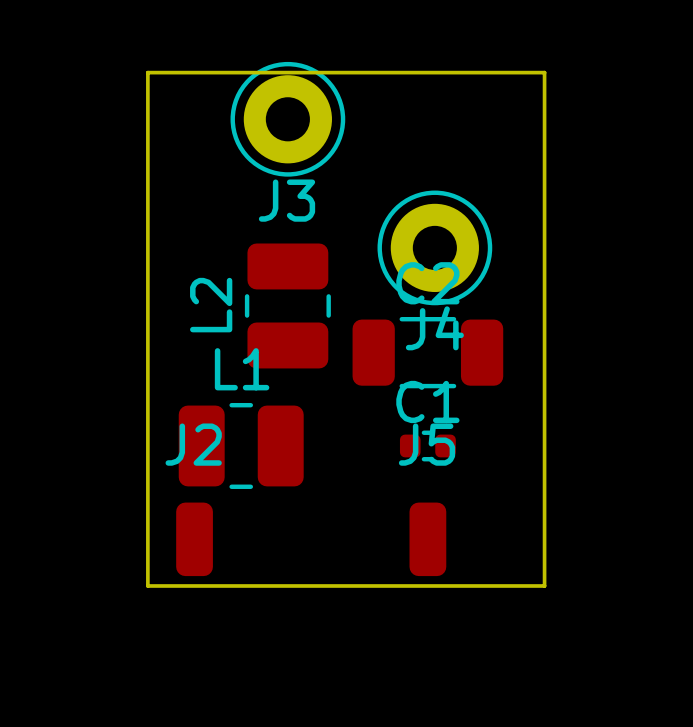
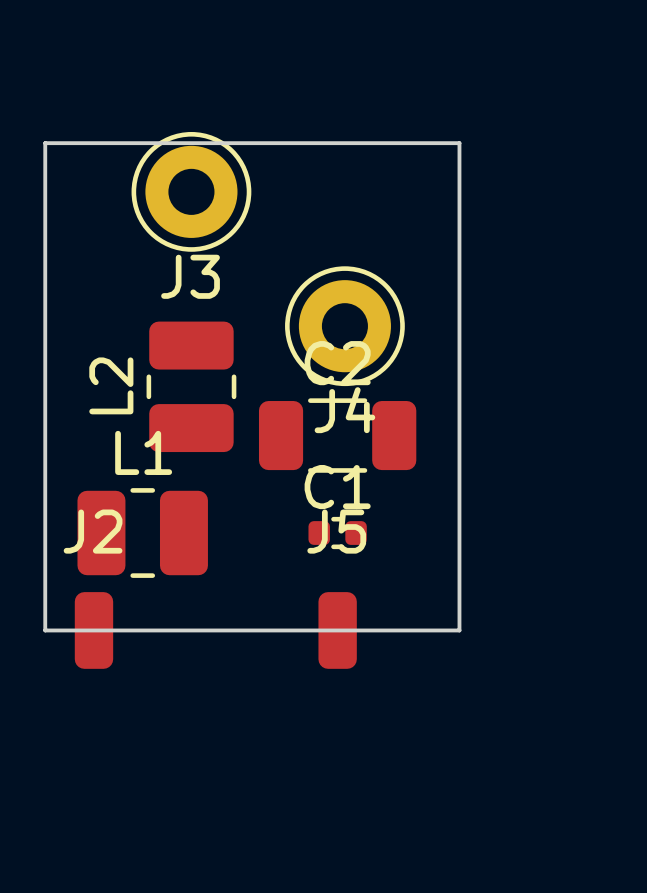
board edge: (147, 539) (147, 585) (544, 585) (544, 539) -> (45, 630) (459, 630)

